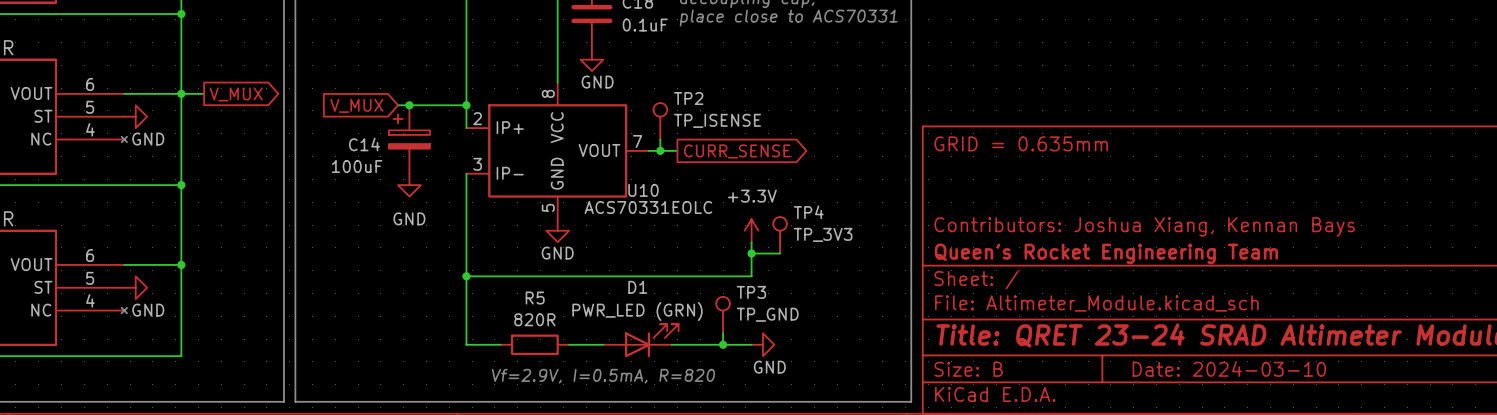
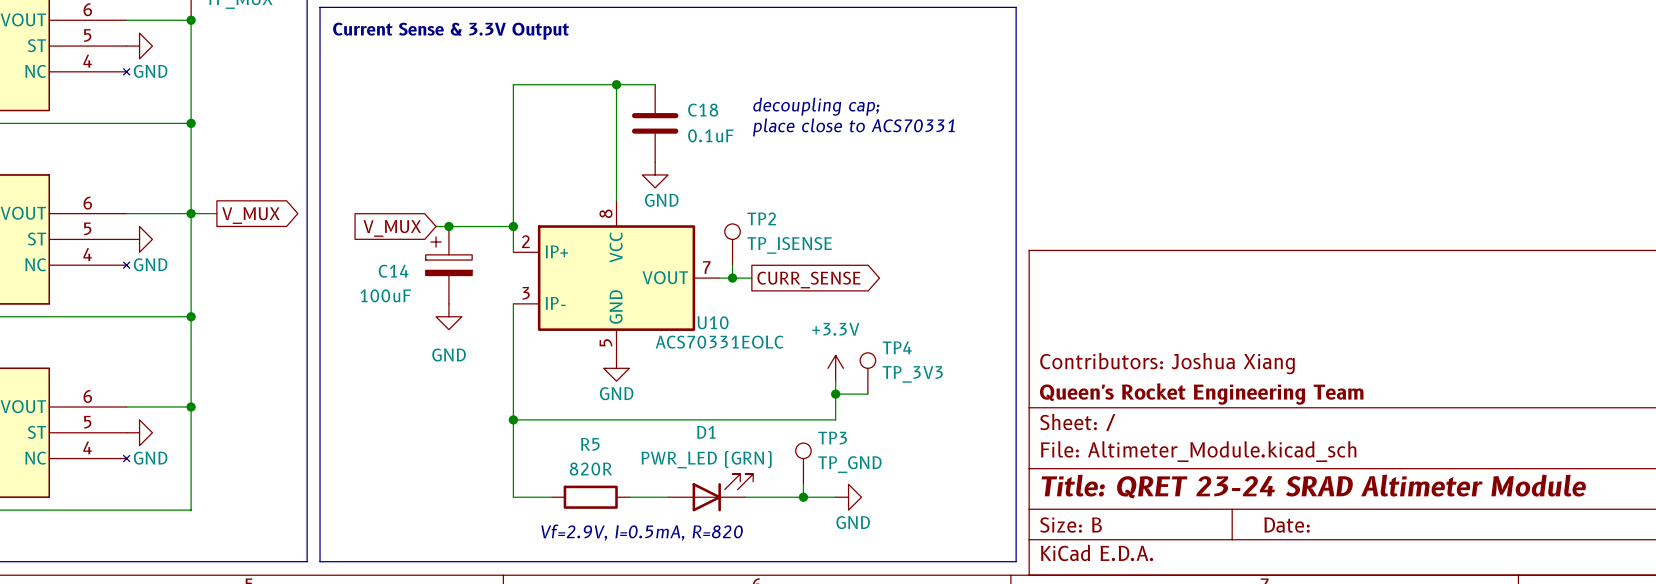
title block: GRID = 0.635mm (1021, 143) -> none
title block: Contributors: Joshua Xiang, Kennan Bays (1144, 226) -> Contributors: Joshua Xiang (1167, 363)
title block: Date: 2024-03-10 (1229, 368) -> Date: (1287, 525)

